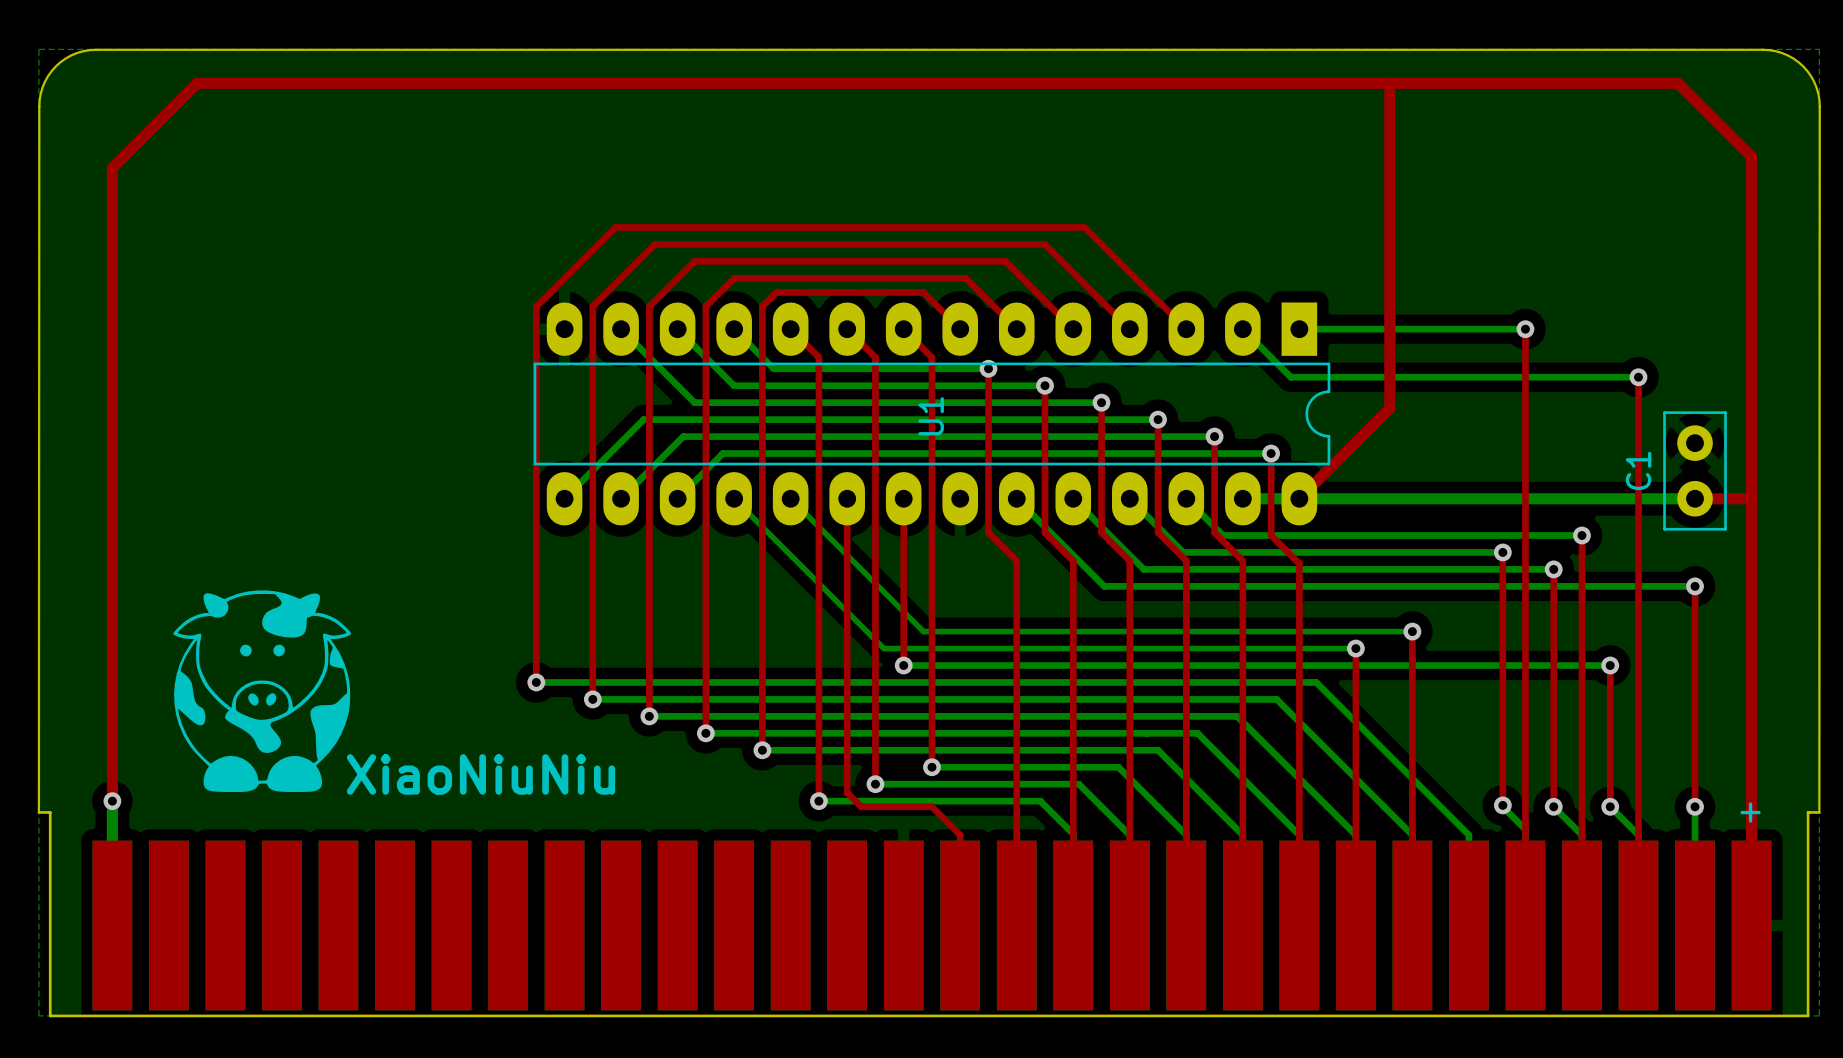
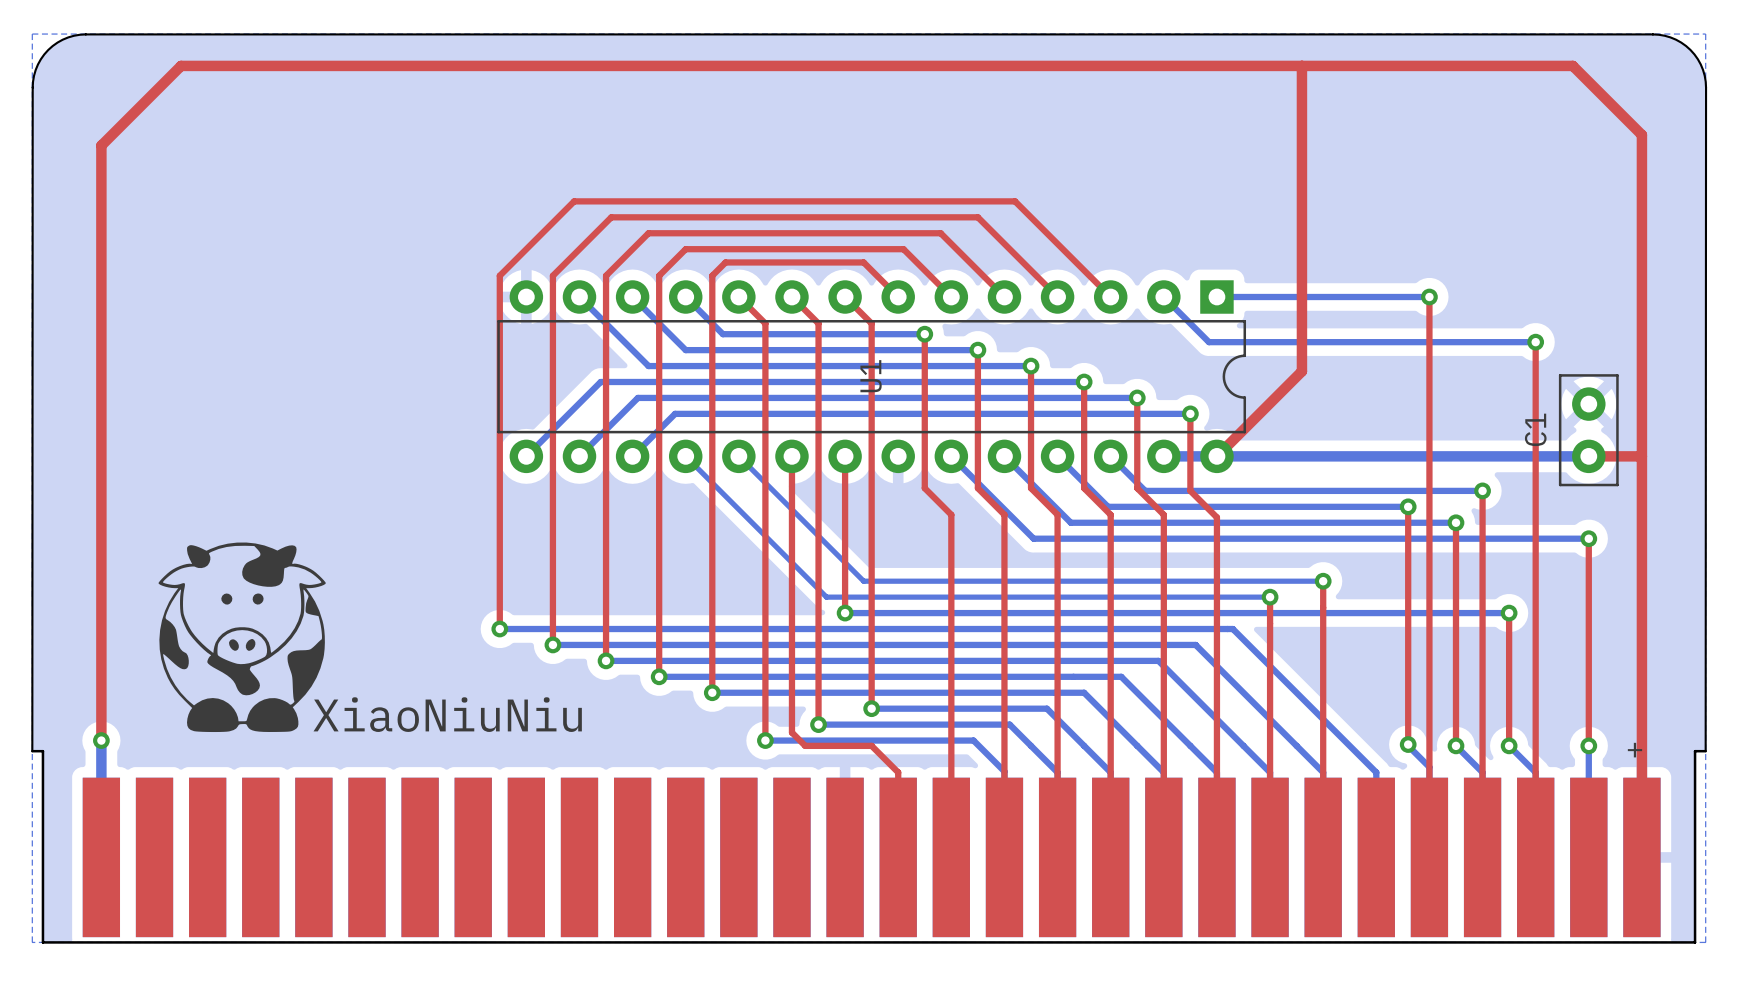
U1 footprint: [533, 302, 1331, 526] -> [497, 280, 1247, 474]

